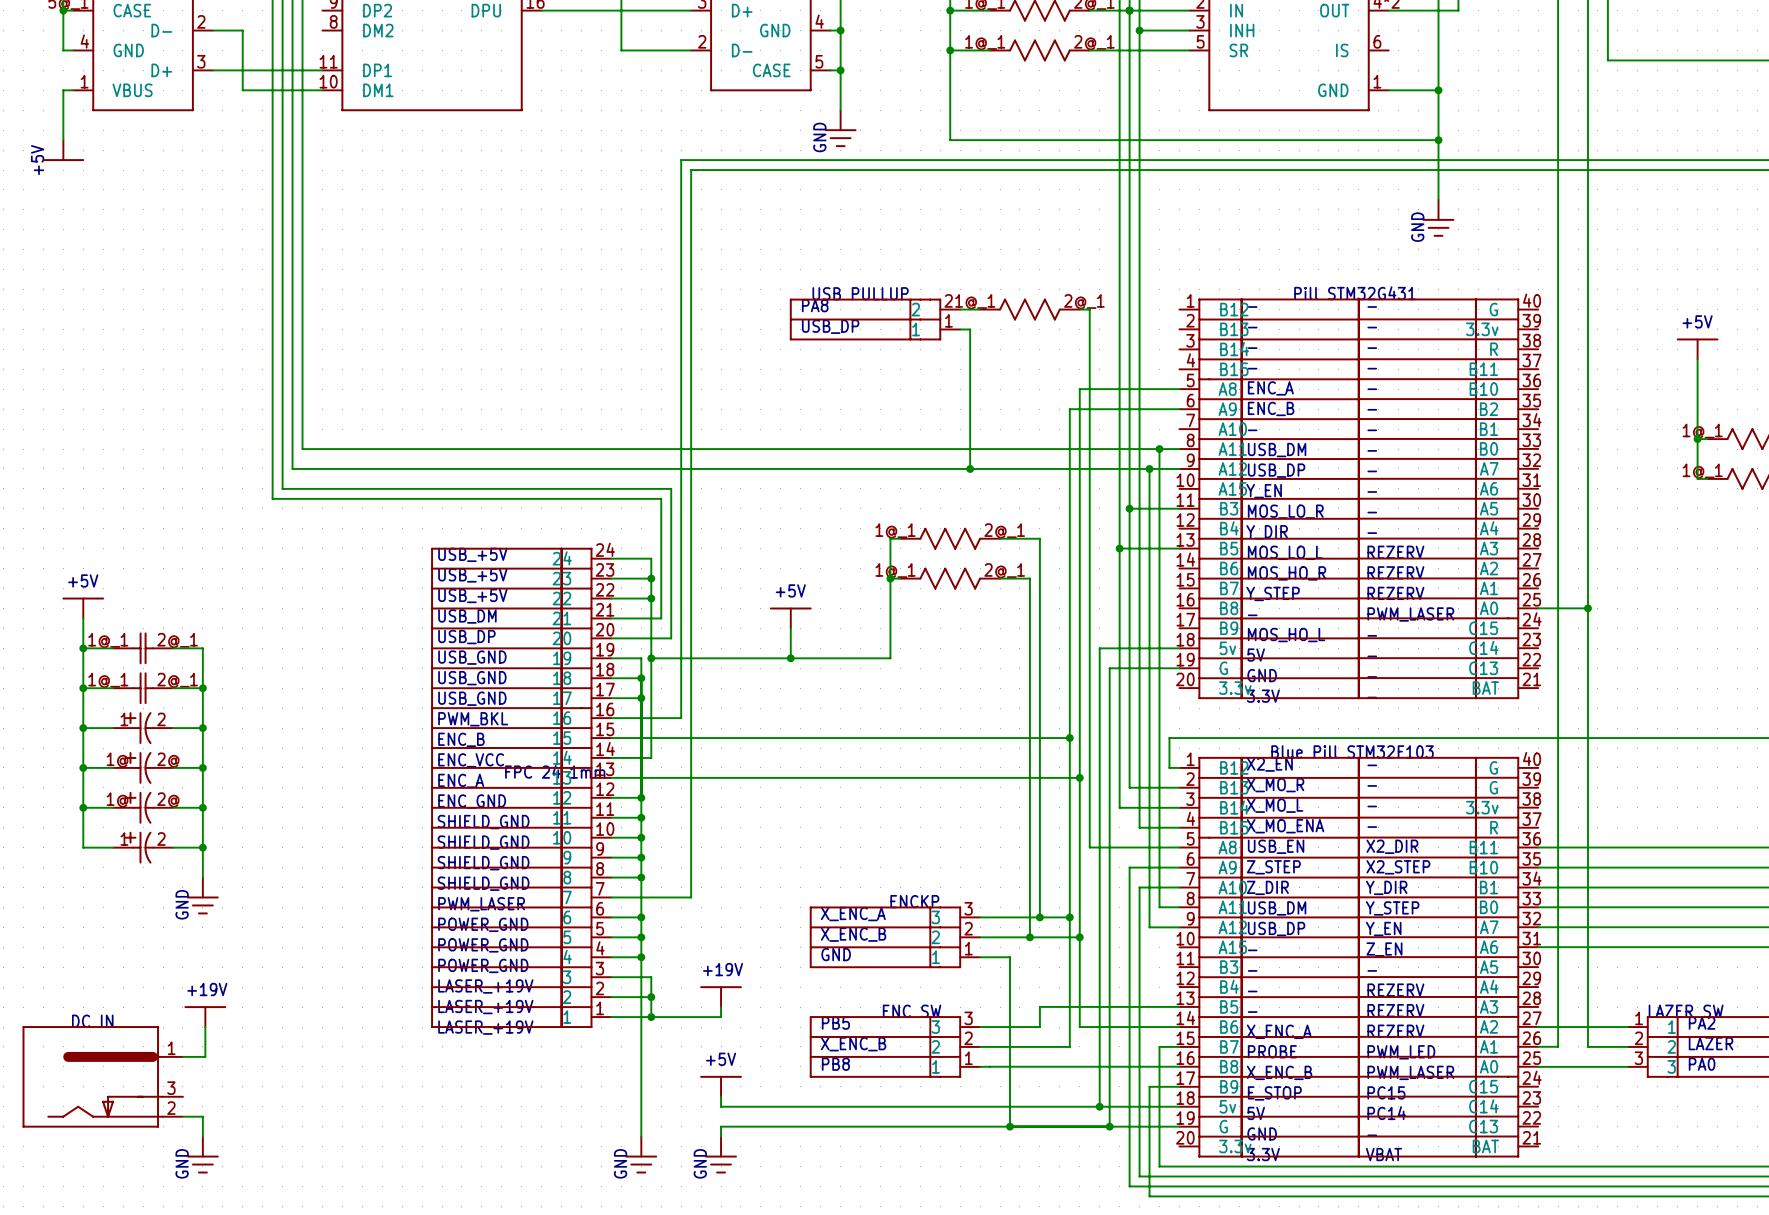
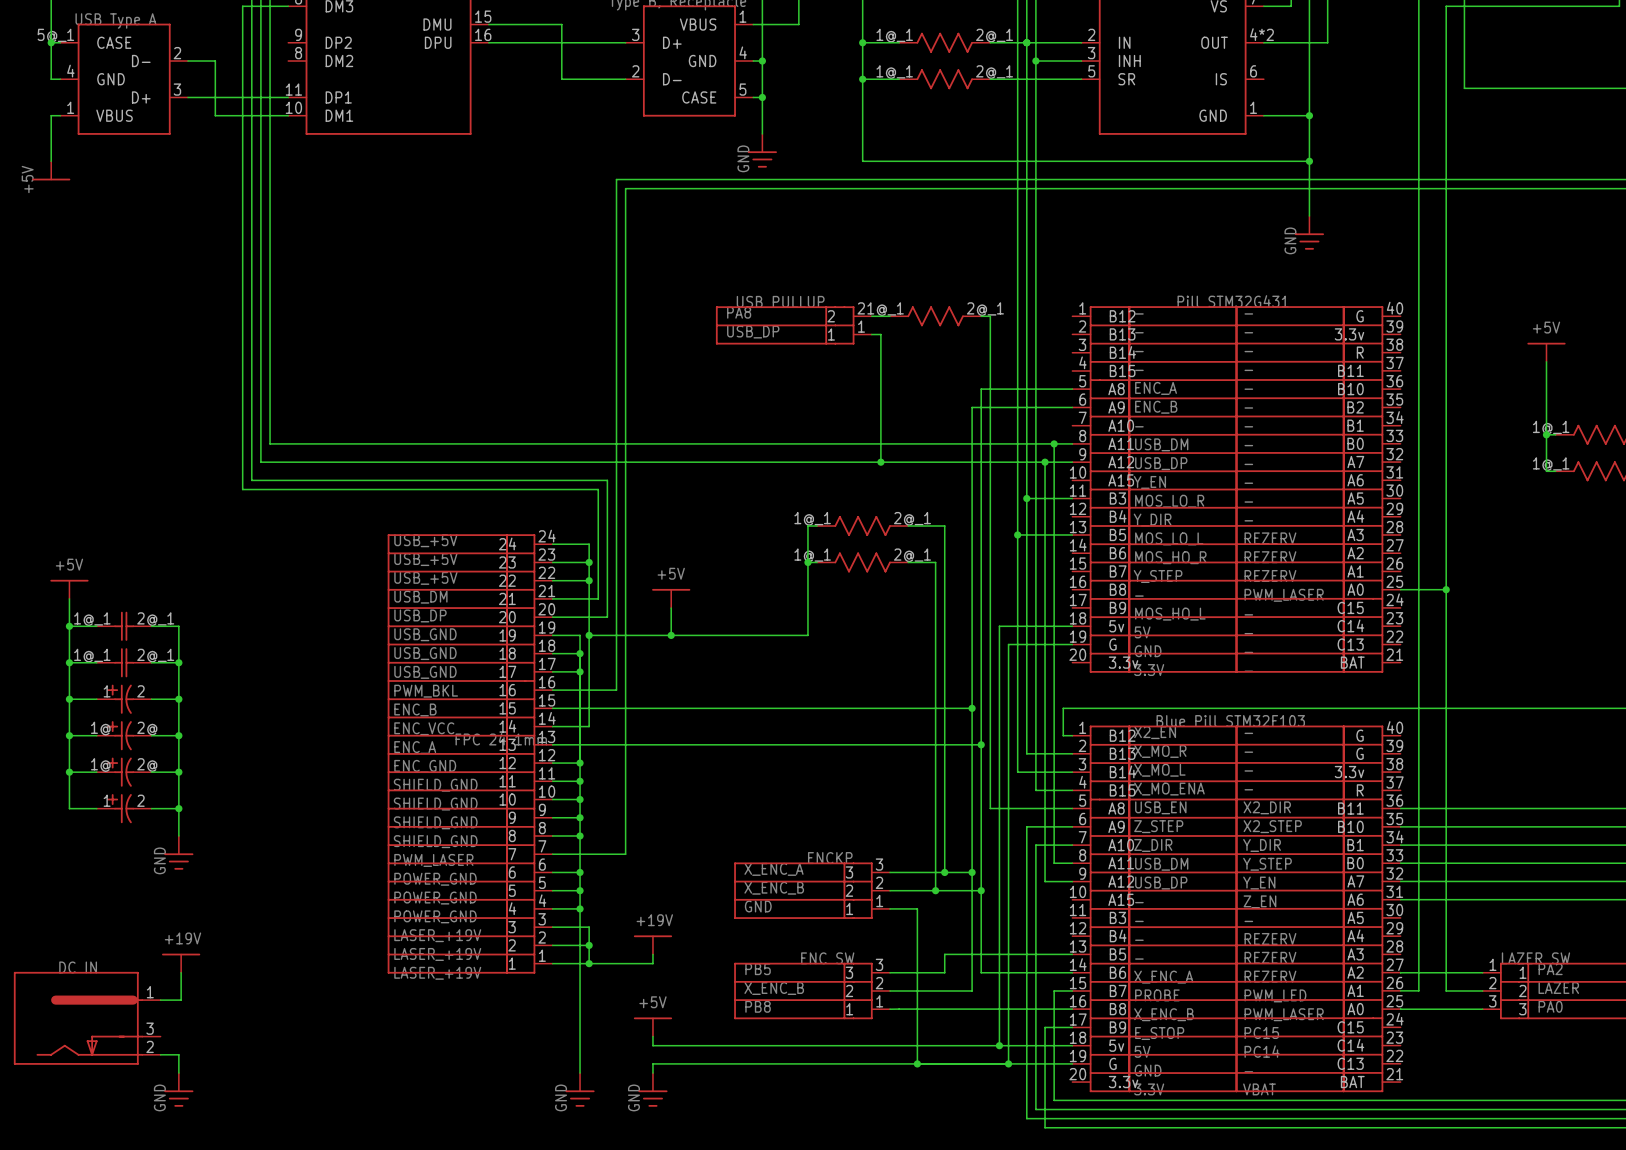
text position: +5V (790, 590) -> +5V (671, 573)
power symbol position: (790, 617) -> (671, 598)
wire: (790, 628) (790, 658) -> (671, 608) (671, 635)
junction: none -> (671, 635)
junction: (790, 658) -> none

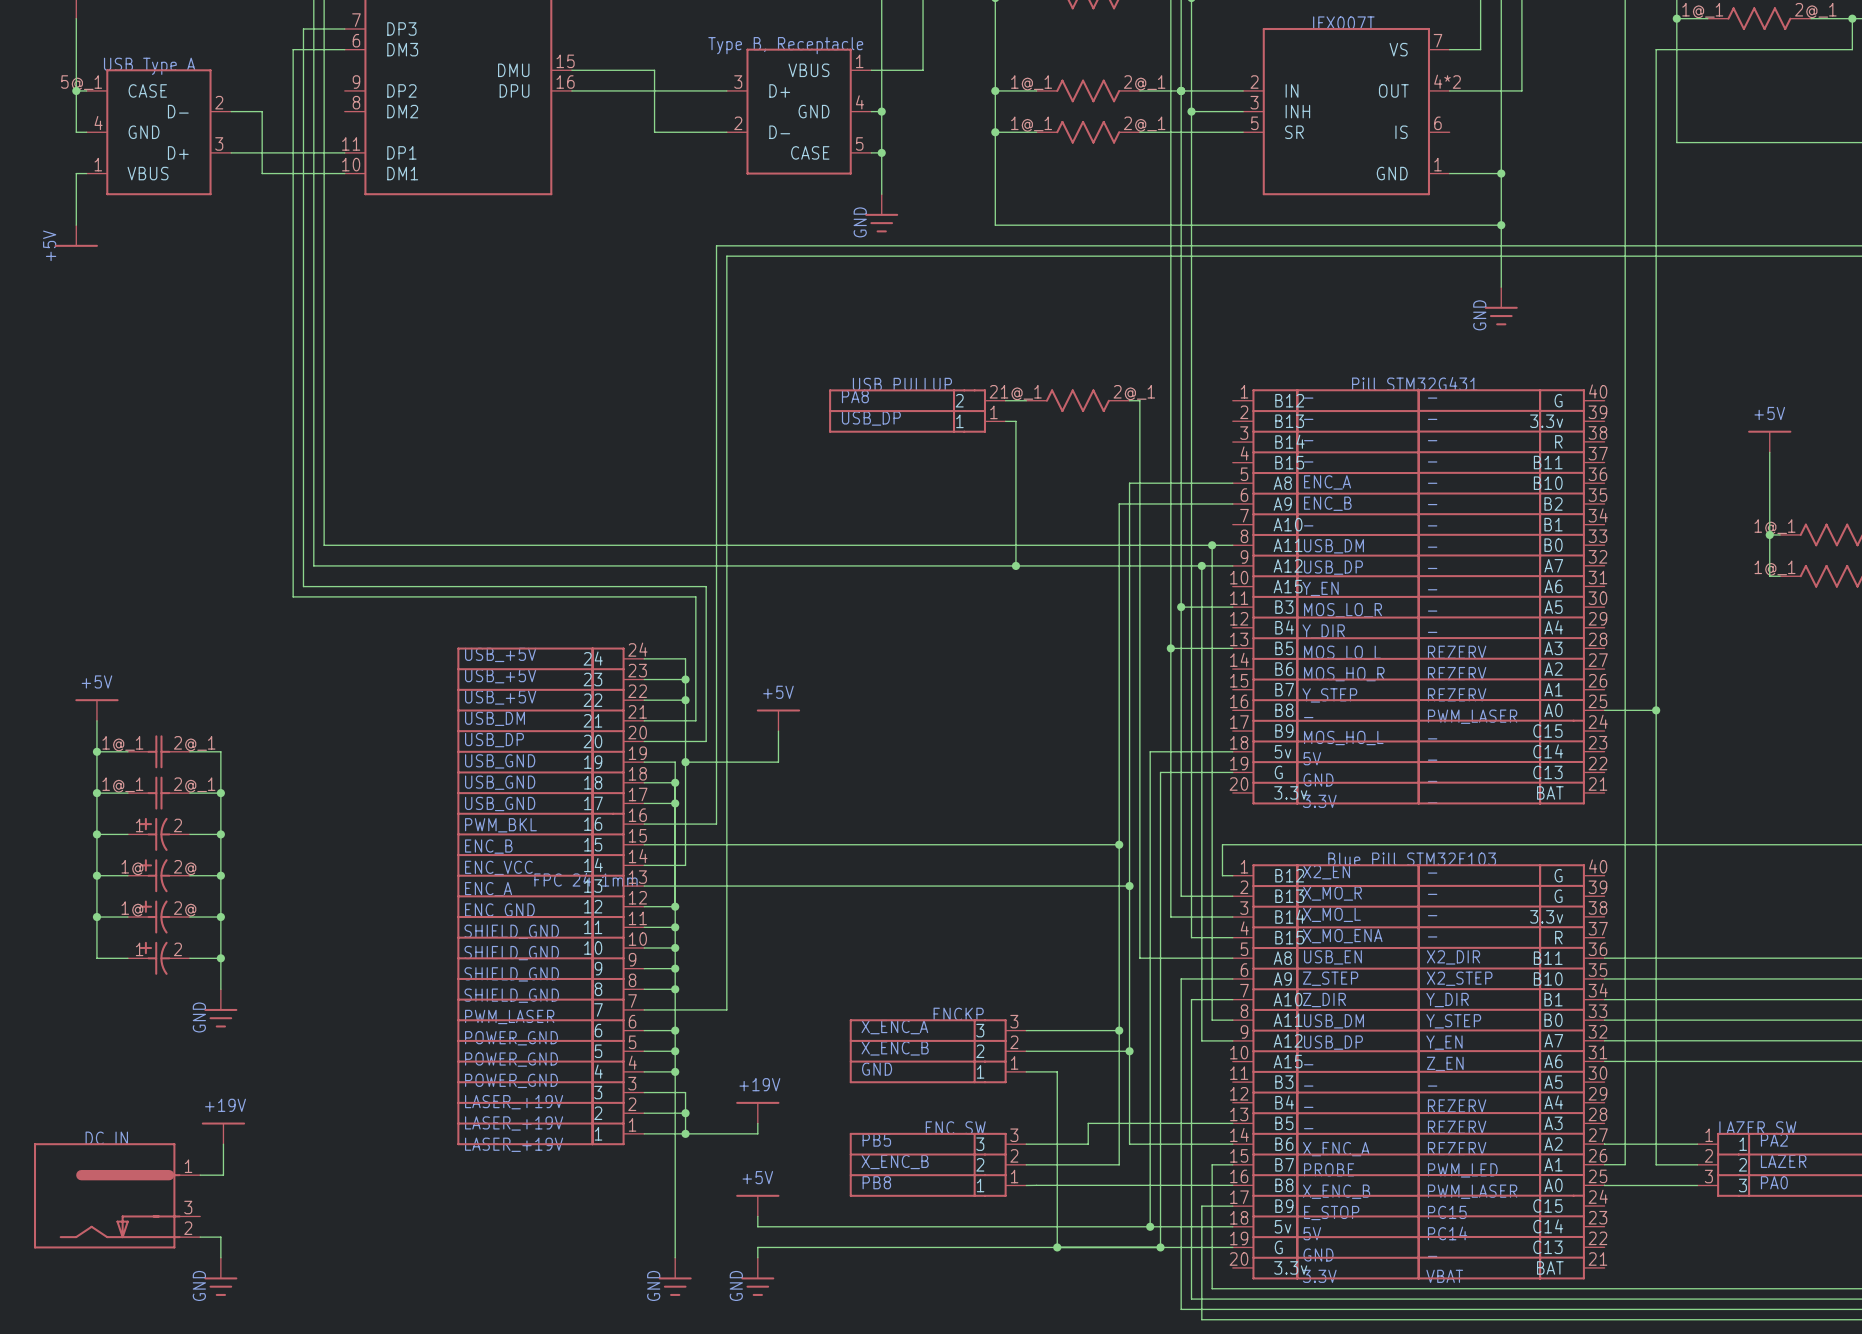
wire: (817, 526) (807, 526) (807, 635) (671, 635) -> none
part: (862, 526) -> none
wire: (908, 526) (944, 526) (944, 872) -> none
wire: (807, 562) (817, 562) -> none
junction: (807, 562) -> none
part: (862, 562) -> none
wire: (908, 562) (935, 562) (935, 890) -> none
junction: (671, 635) -> none
junction: (944, 872) -> none
junction: (935, 890) -> none

